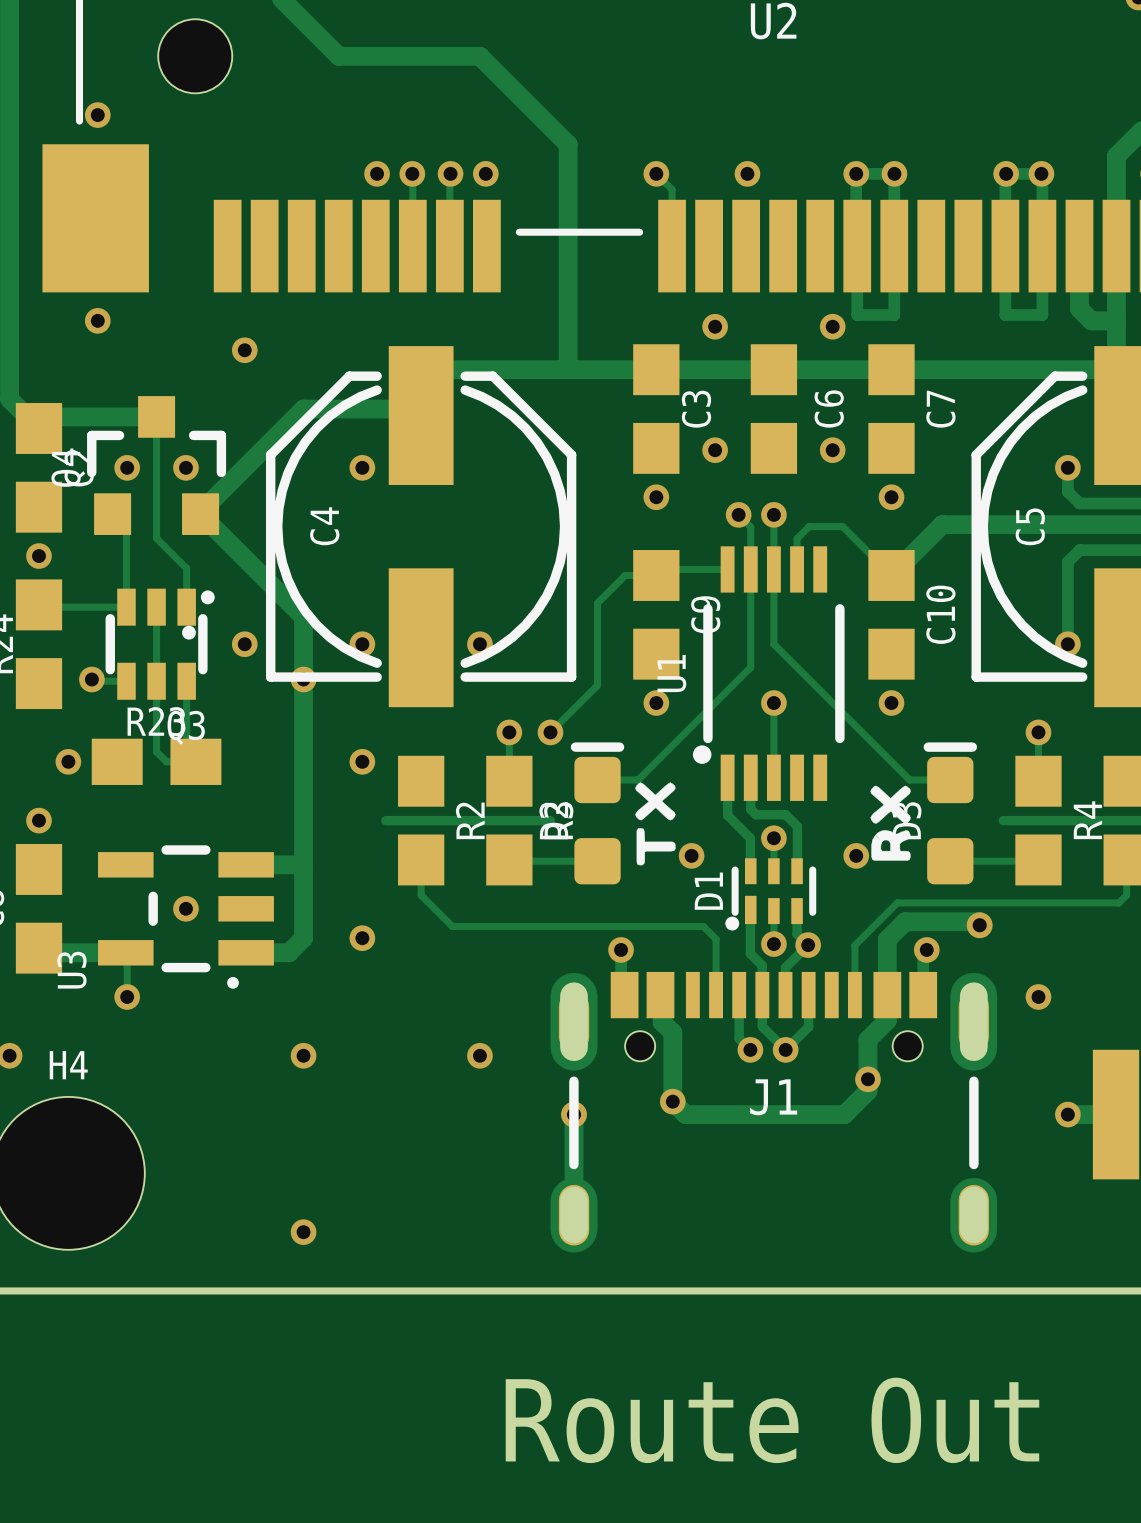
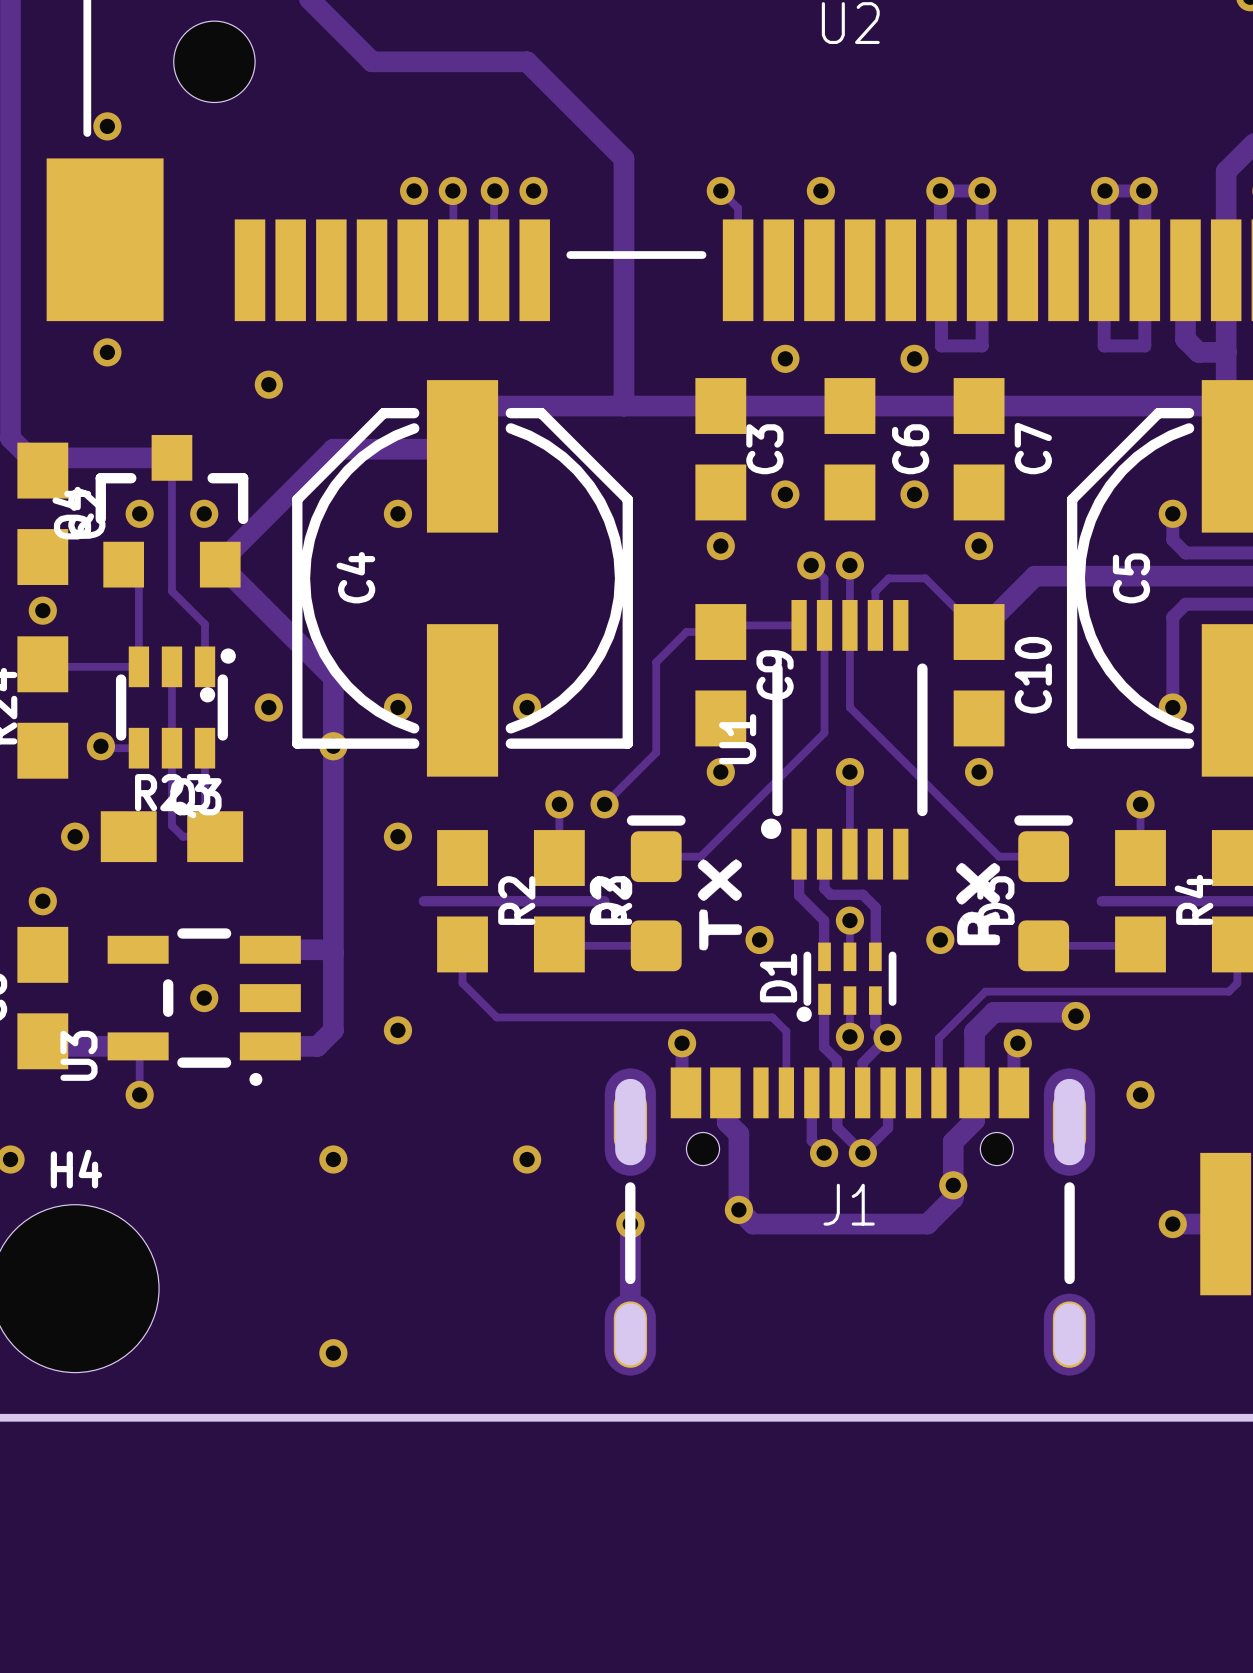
text: Route Out (772, 1420) -> none

